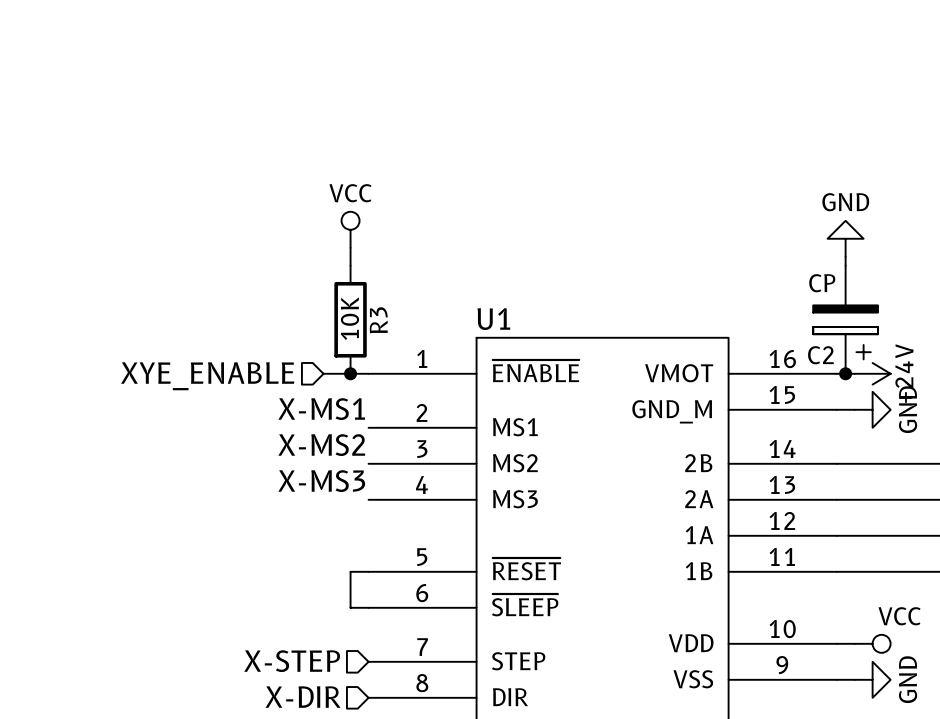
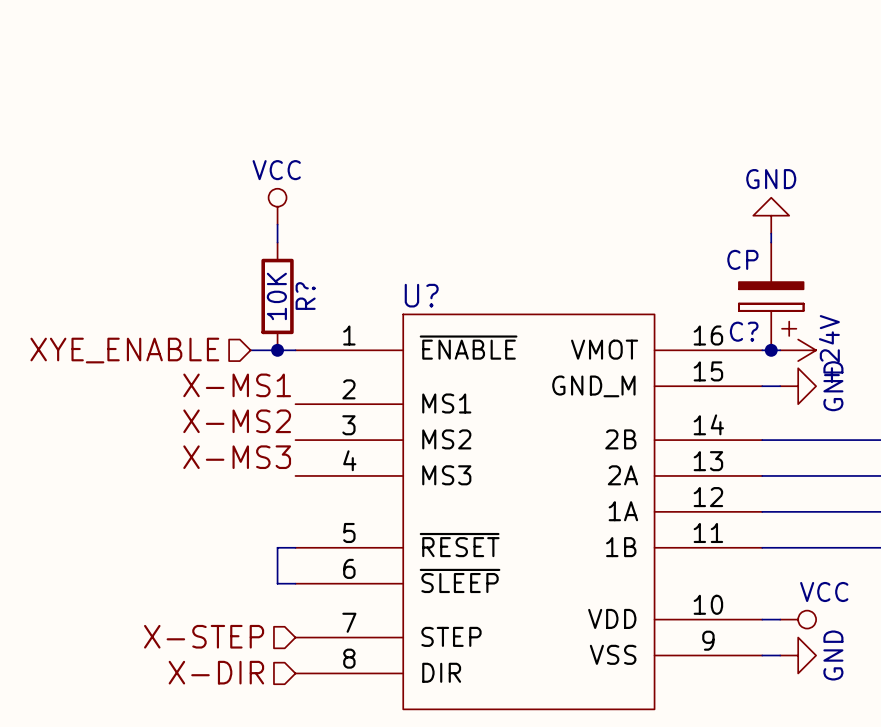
U1 name: U1 (493, 319) -> U? (421, 295)
R3 name: R3 (378, 320) -> R? (305, 296)
C2 name: C2 (820, 355) -> C? (744, 331)

